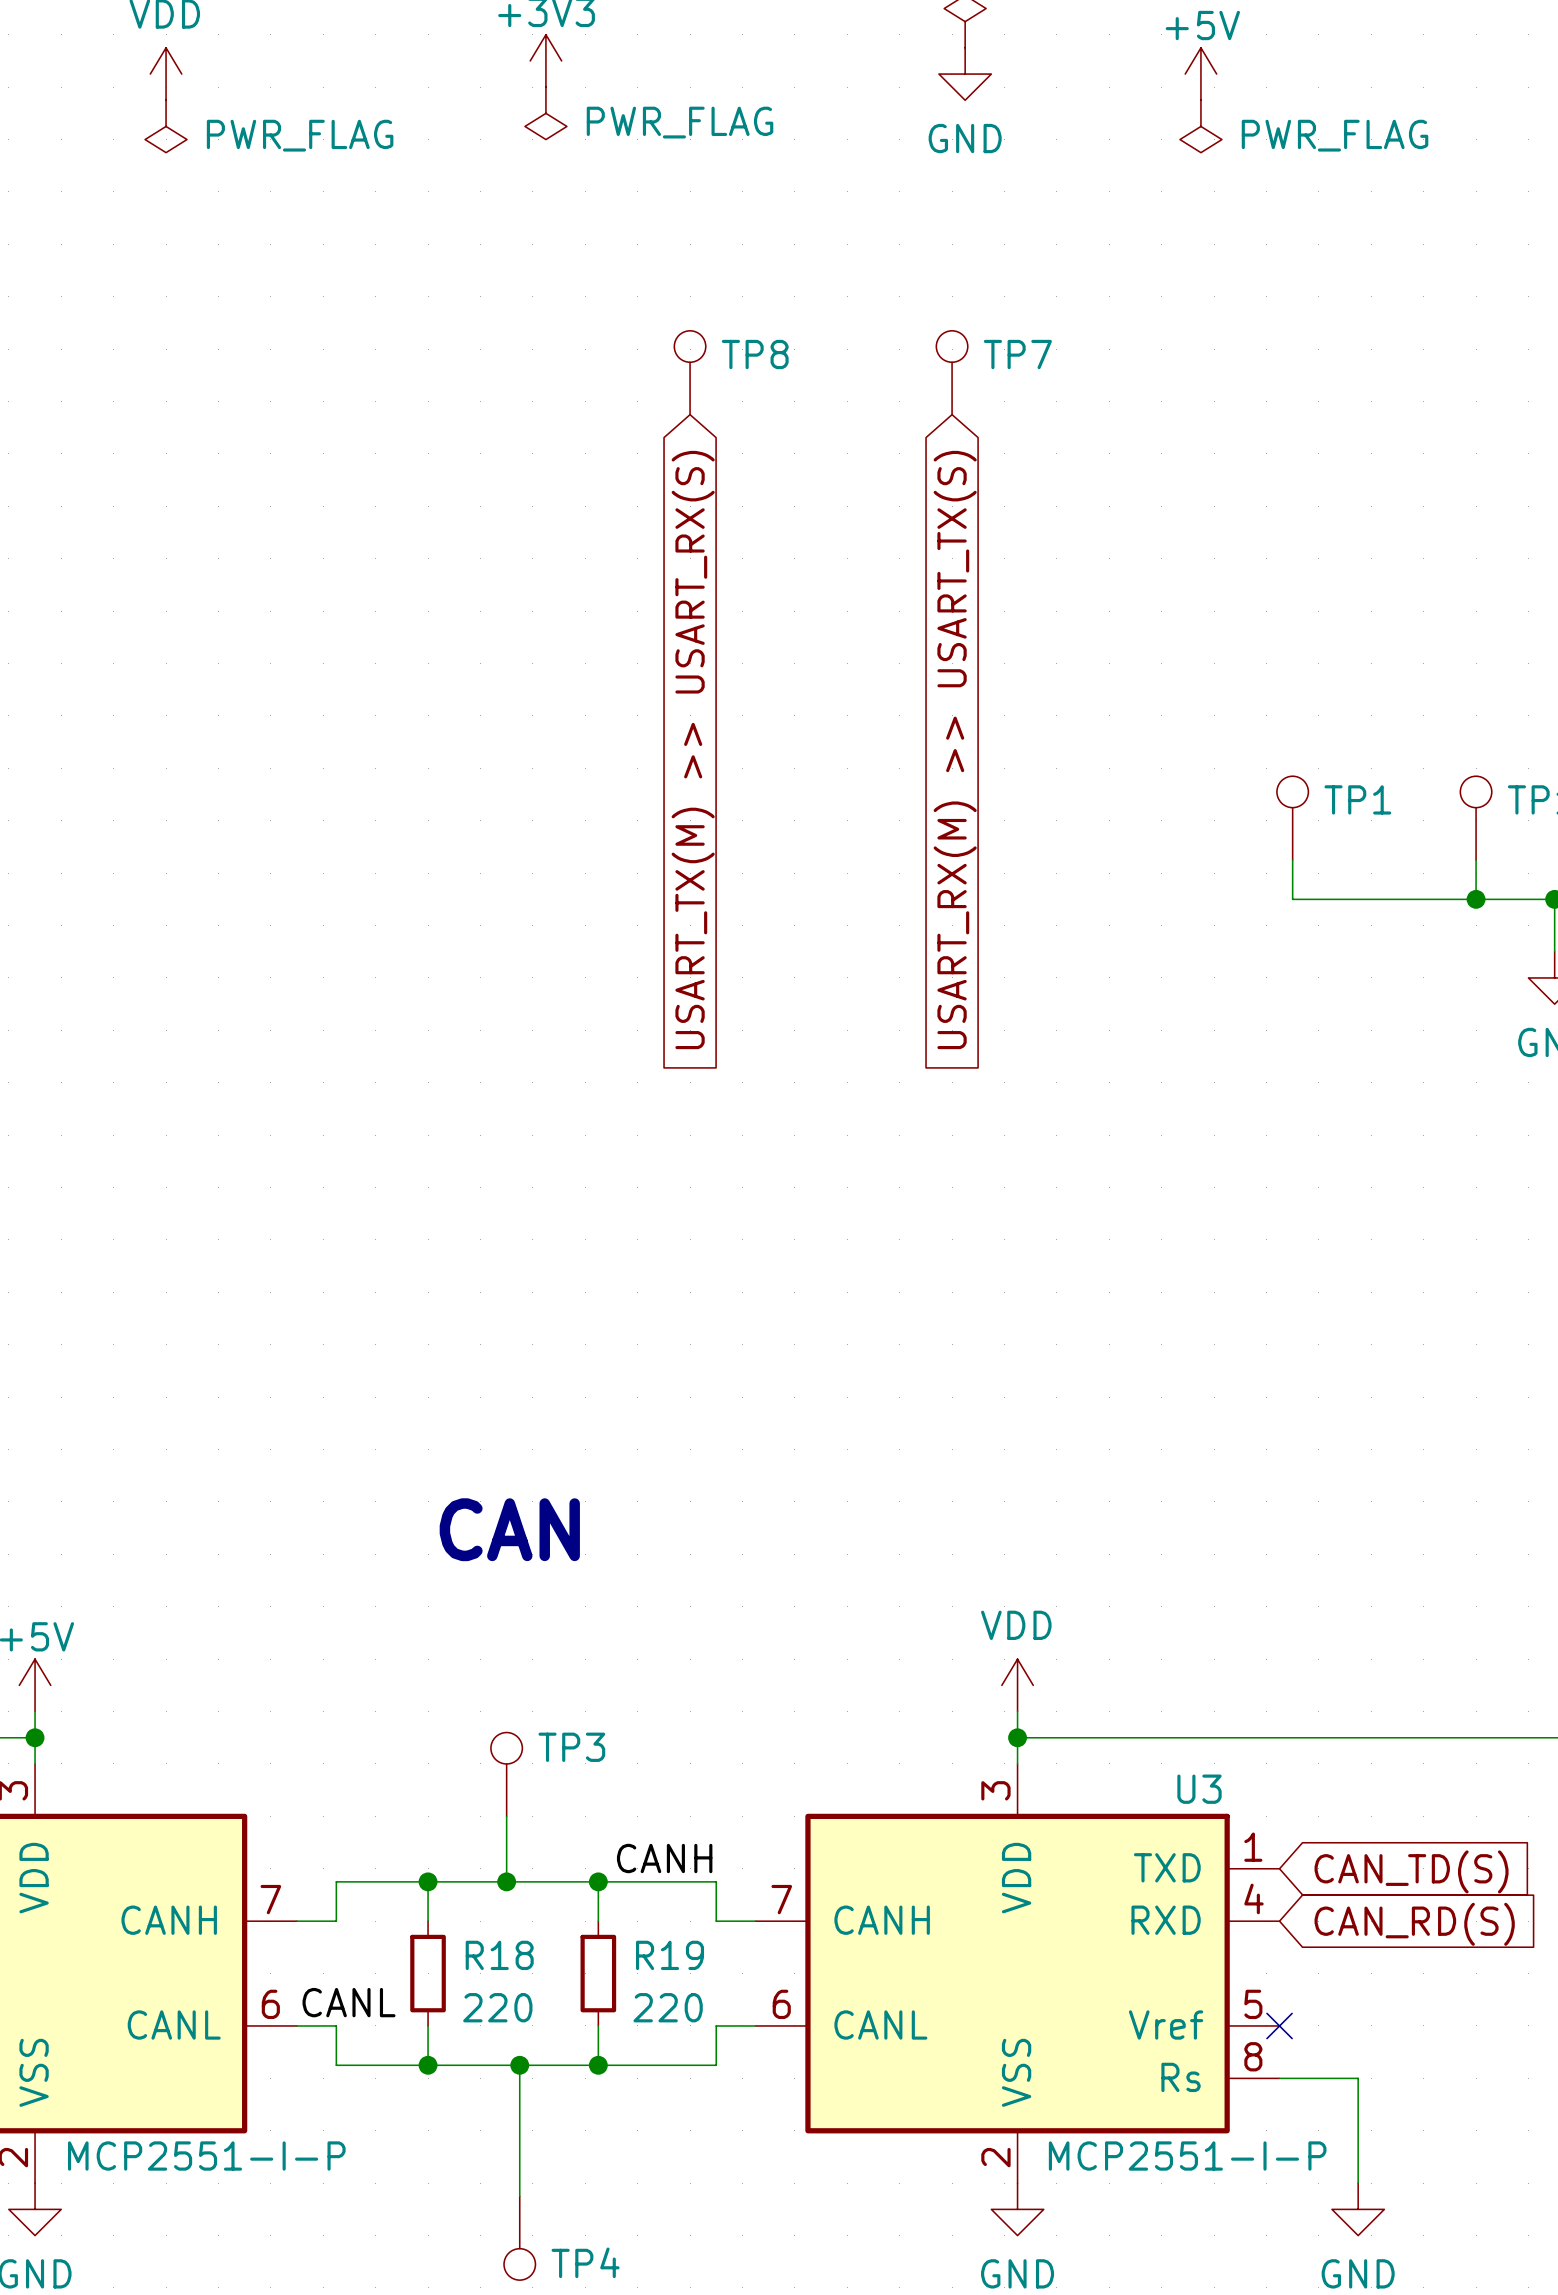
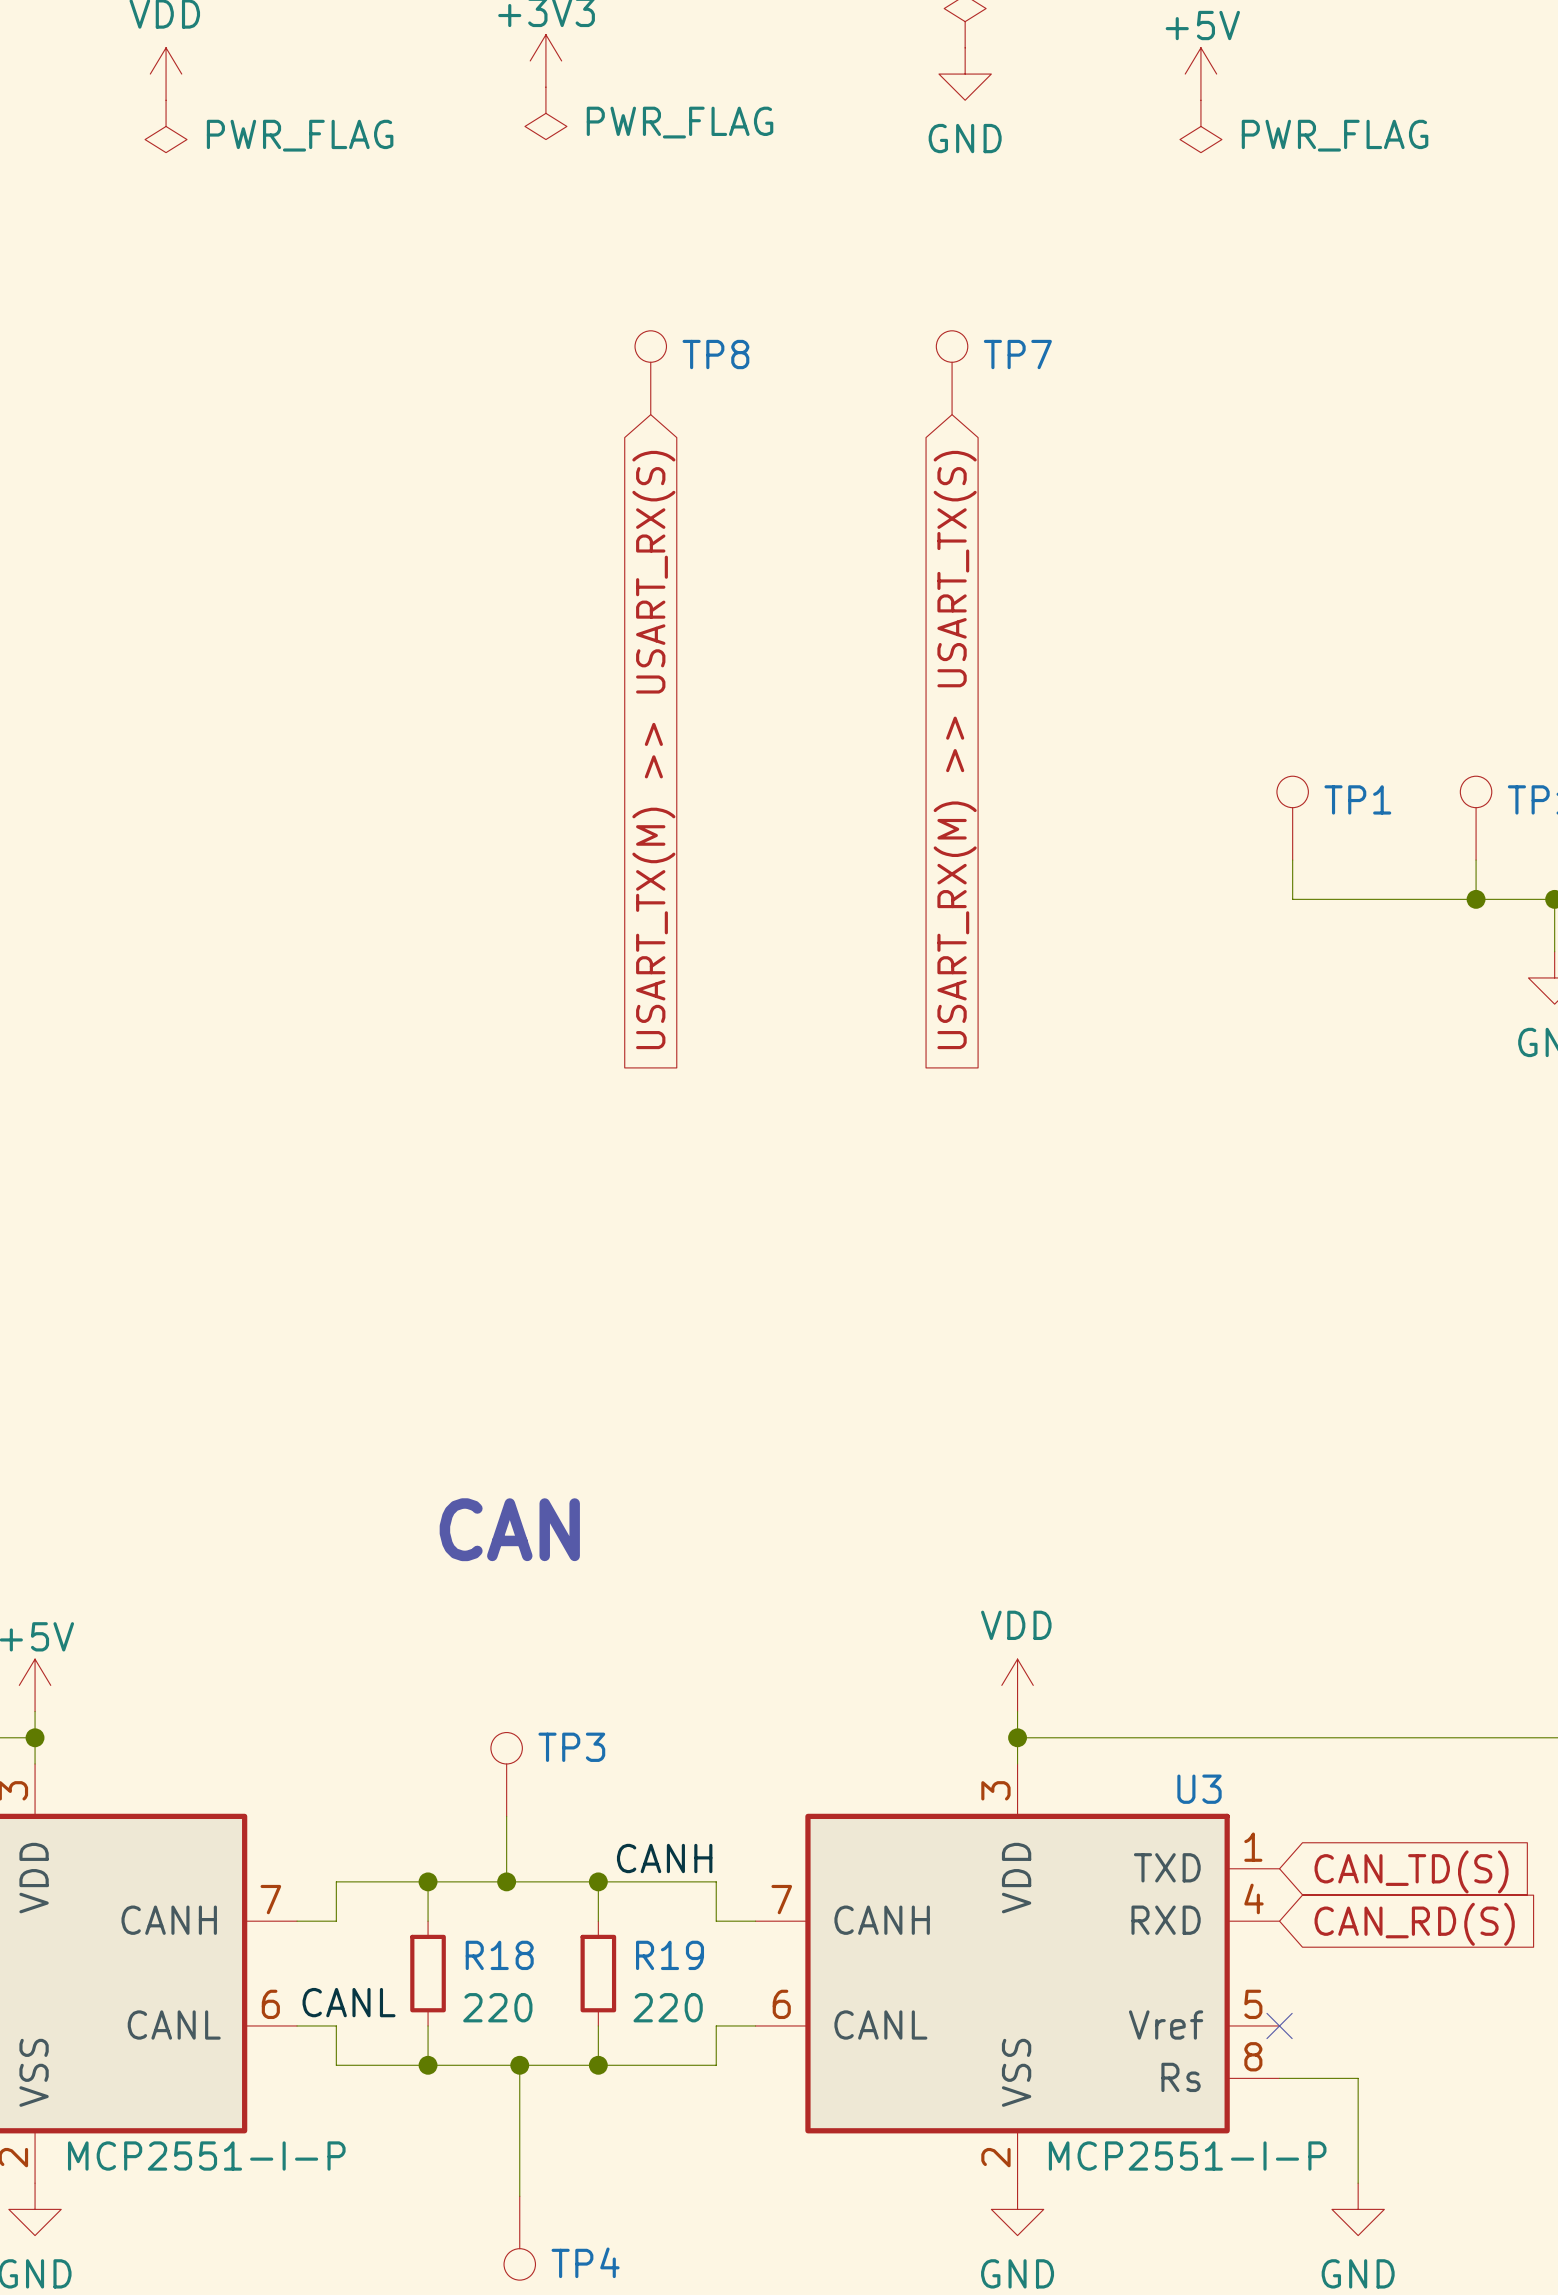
TP8 position: (690, 372) -> (650, 372)
global label position: USART_TX(M) >> USART_RX(S) (693, 750) -> USART_TX(M) >> USART_RX(S) (653, 750)

